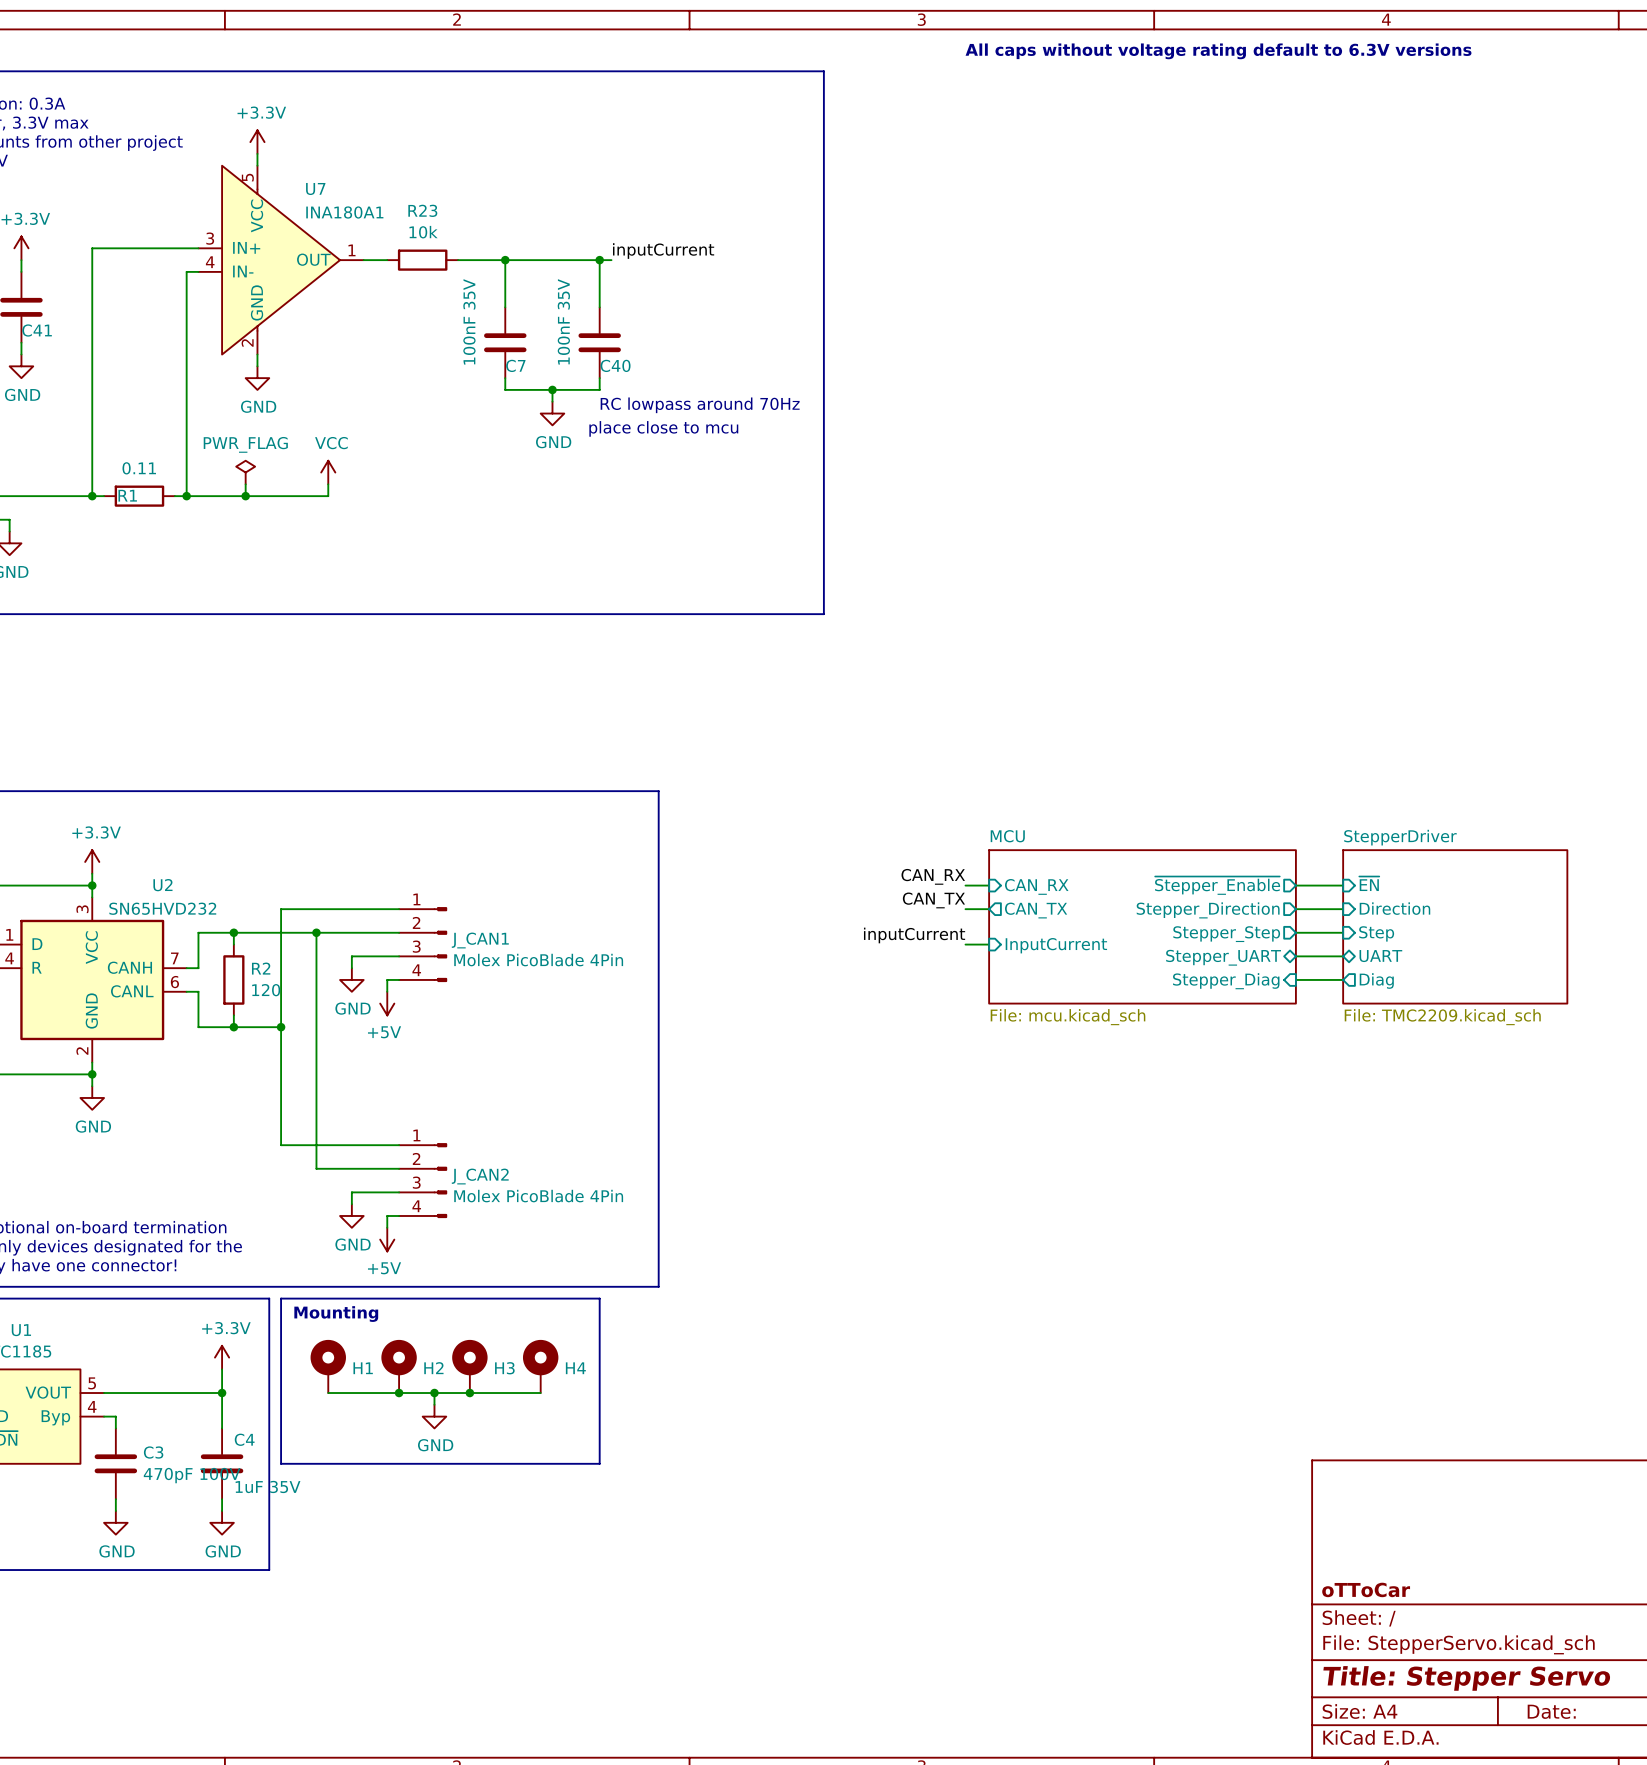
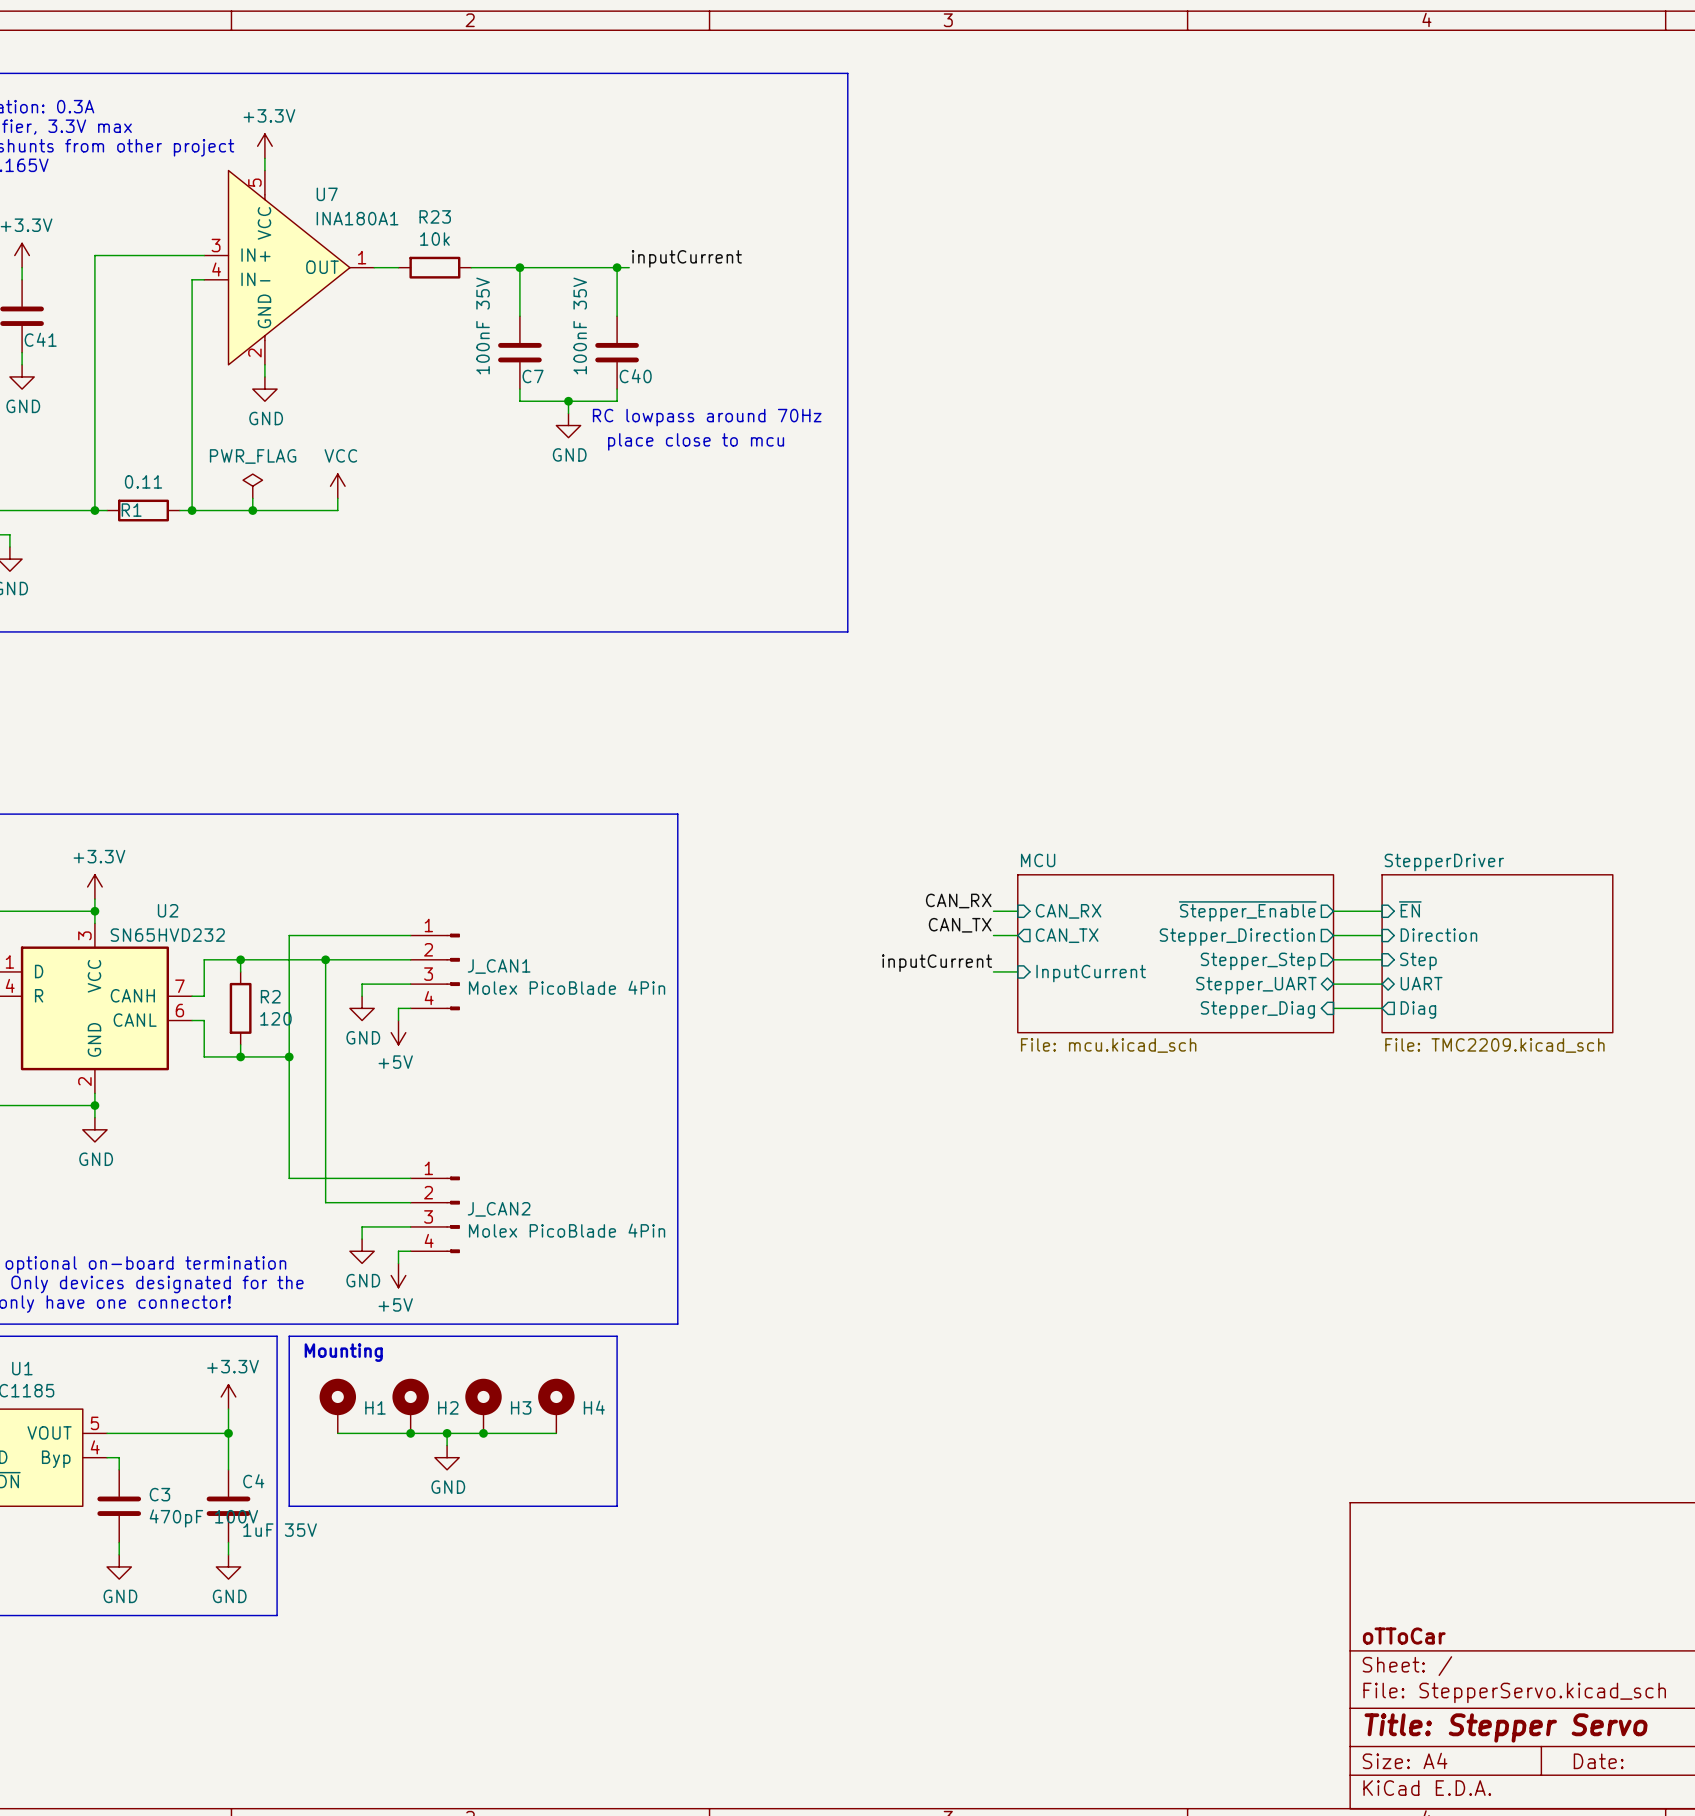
text: All caps without voltage rating default to 6.3V versions (1218, 51) -> none

